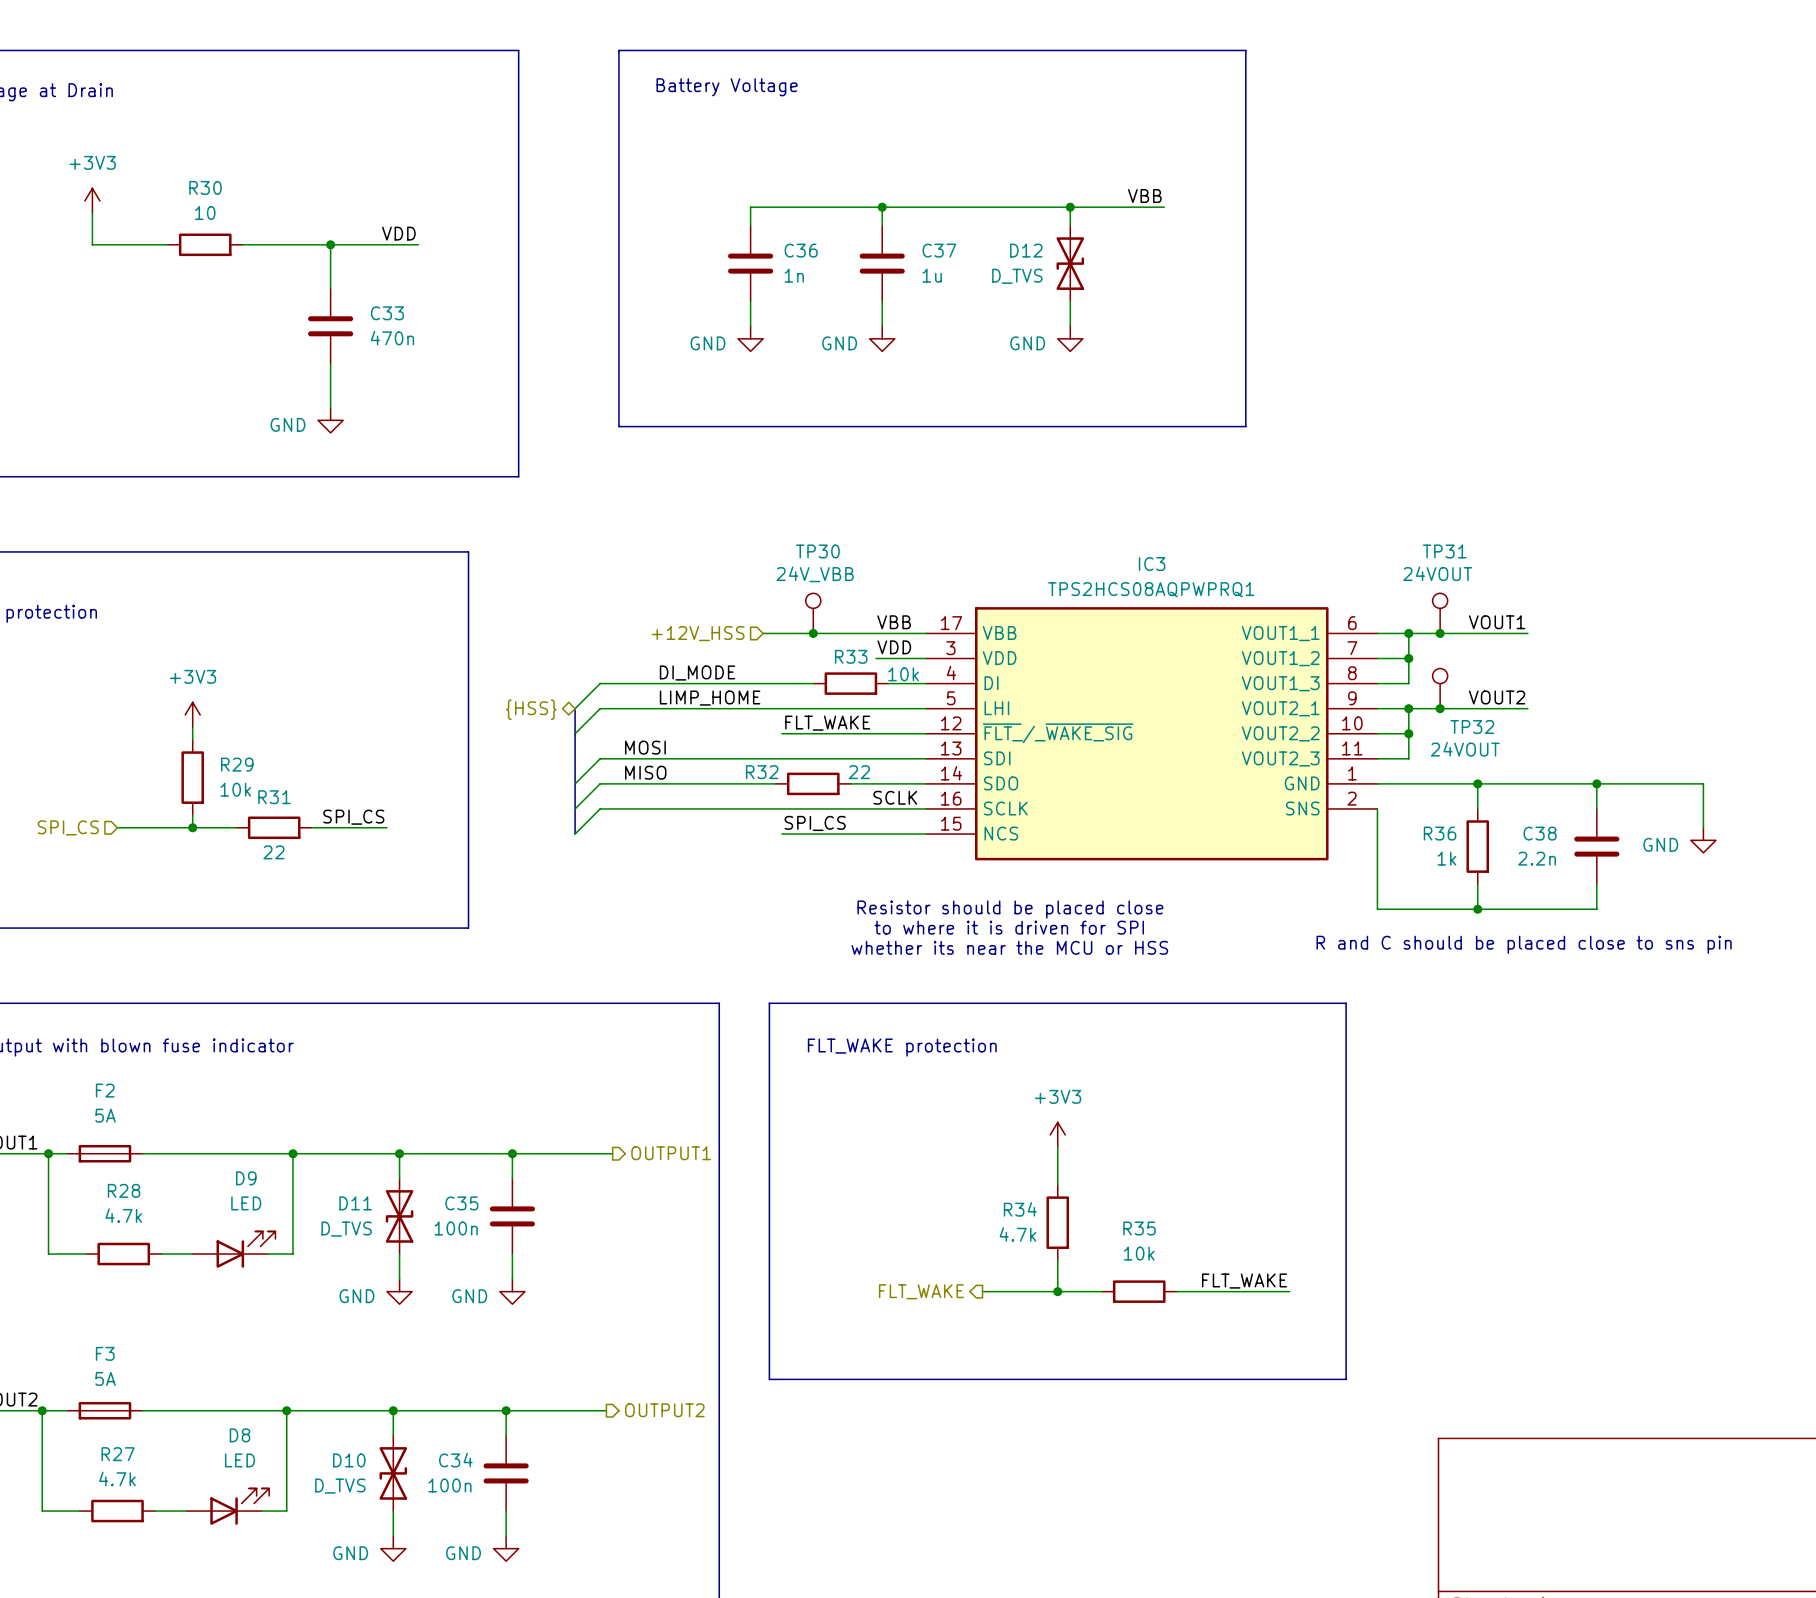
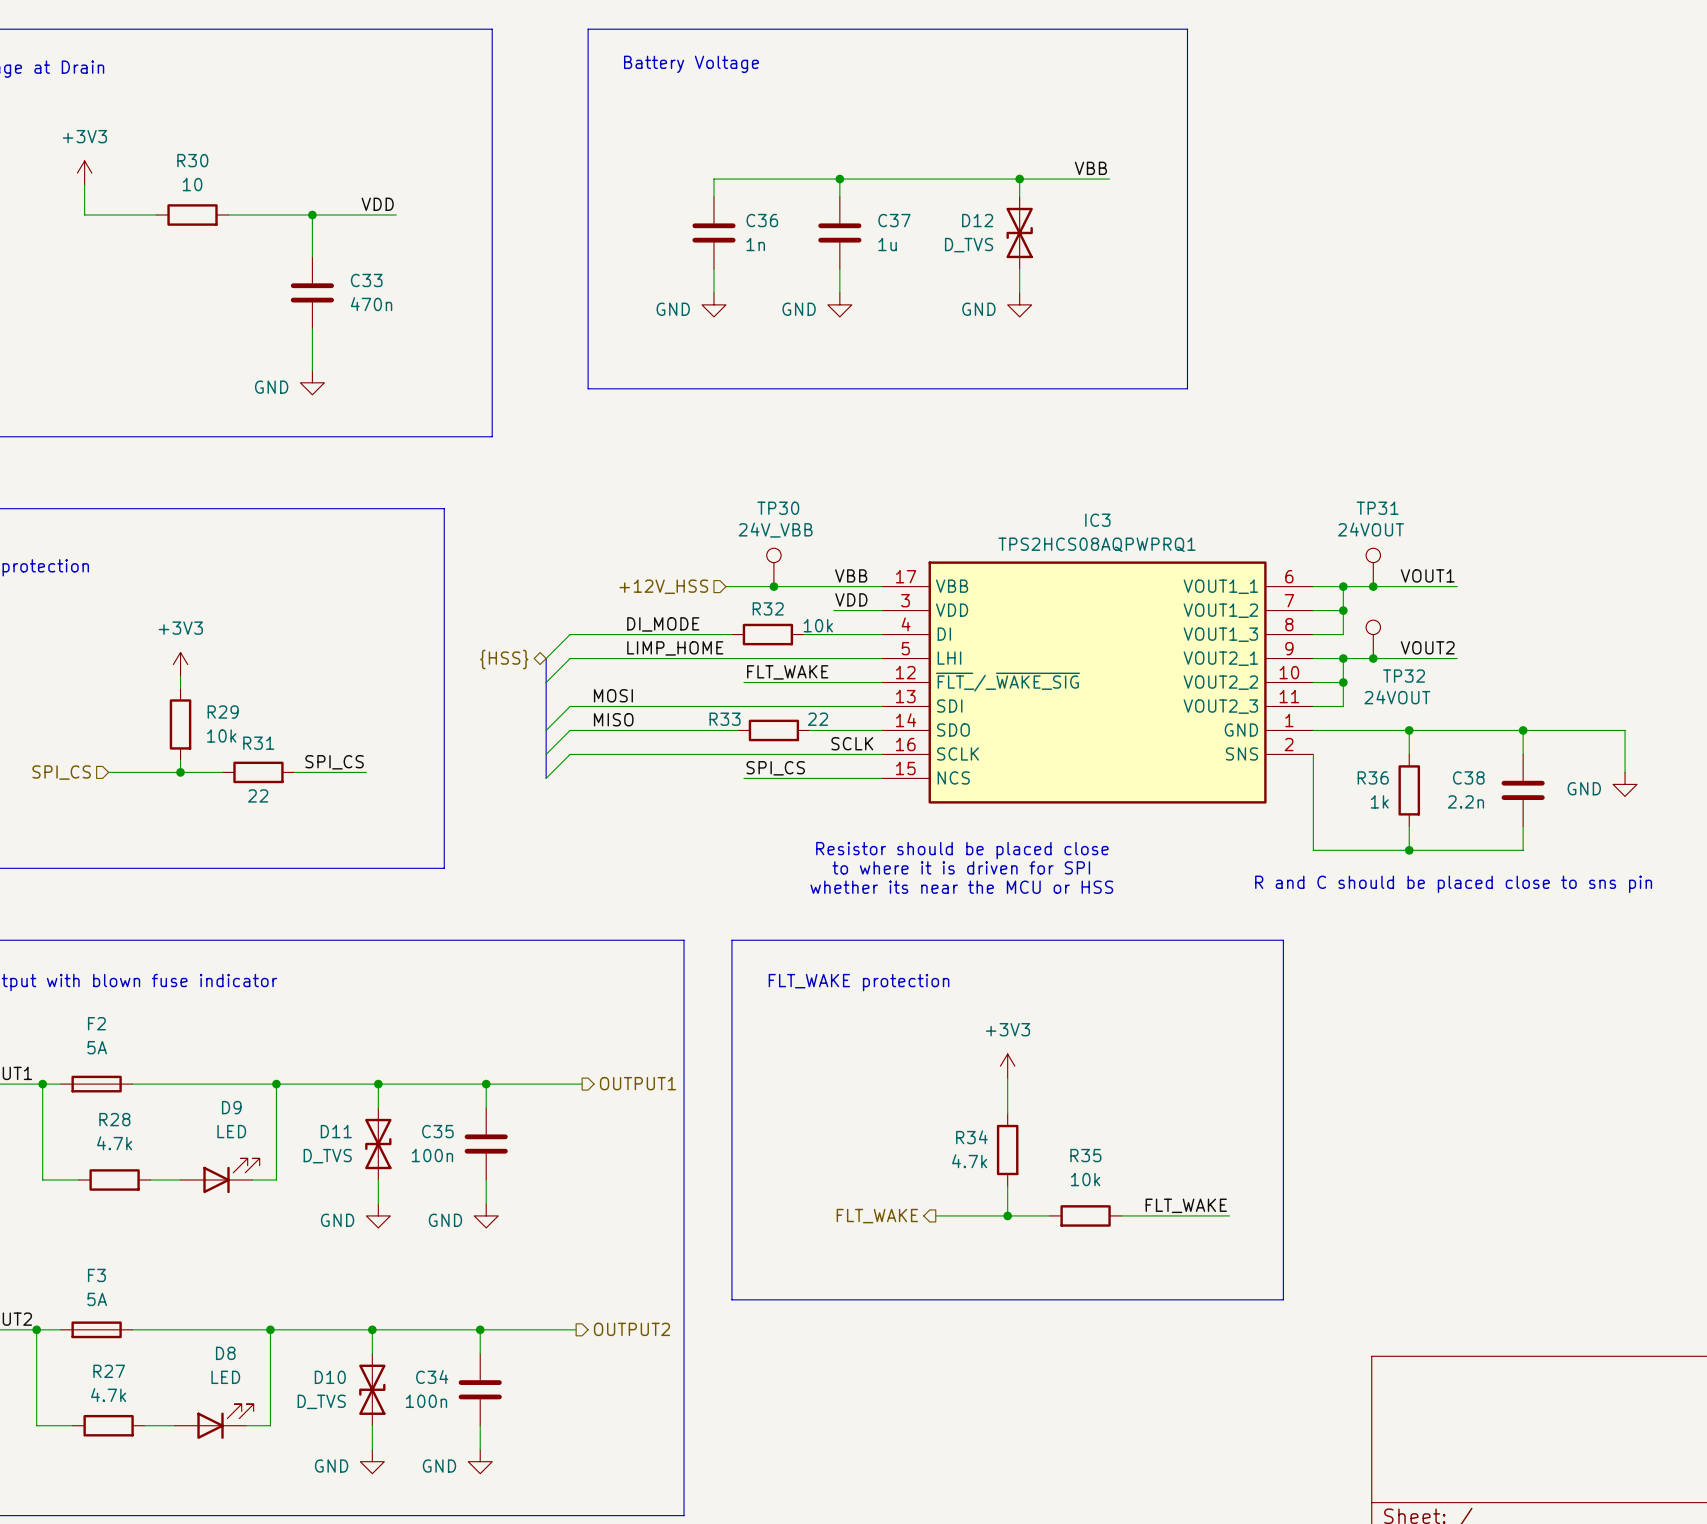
wire: (769, 683) (813, 683) -> (803, 634) (845, 634)
R32: none -> 10k (767, 634)
R33: 10k (850, 683) -> none
R32 name: R32 (762, 772) -> R33 (725, 719)

